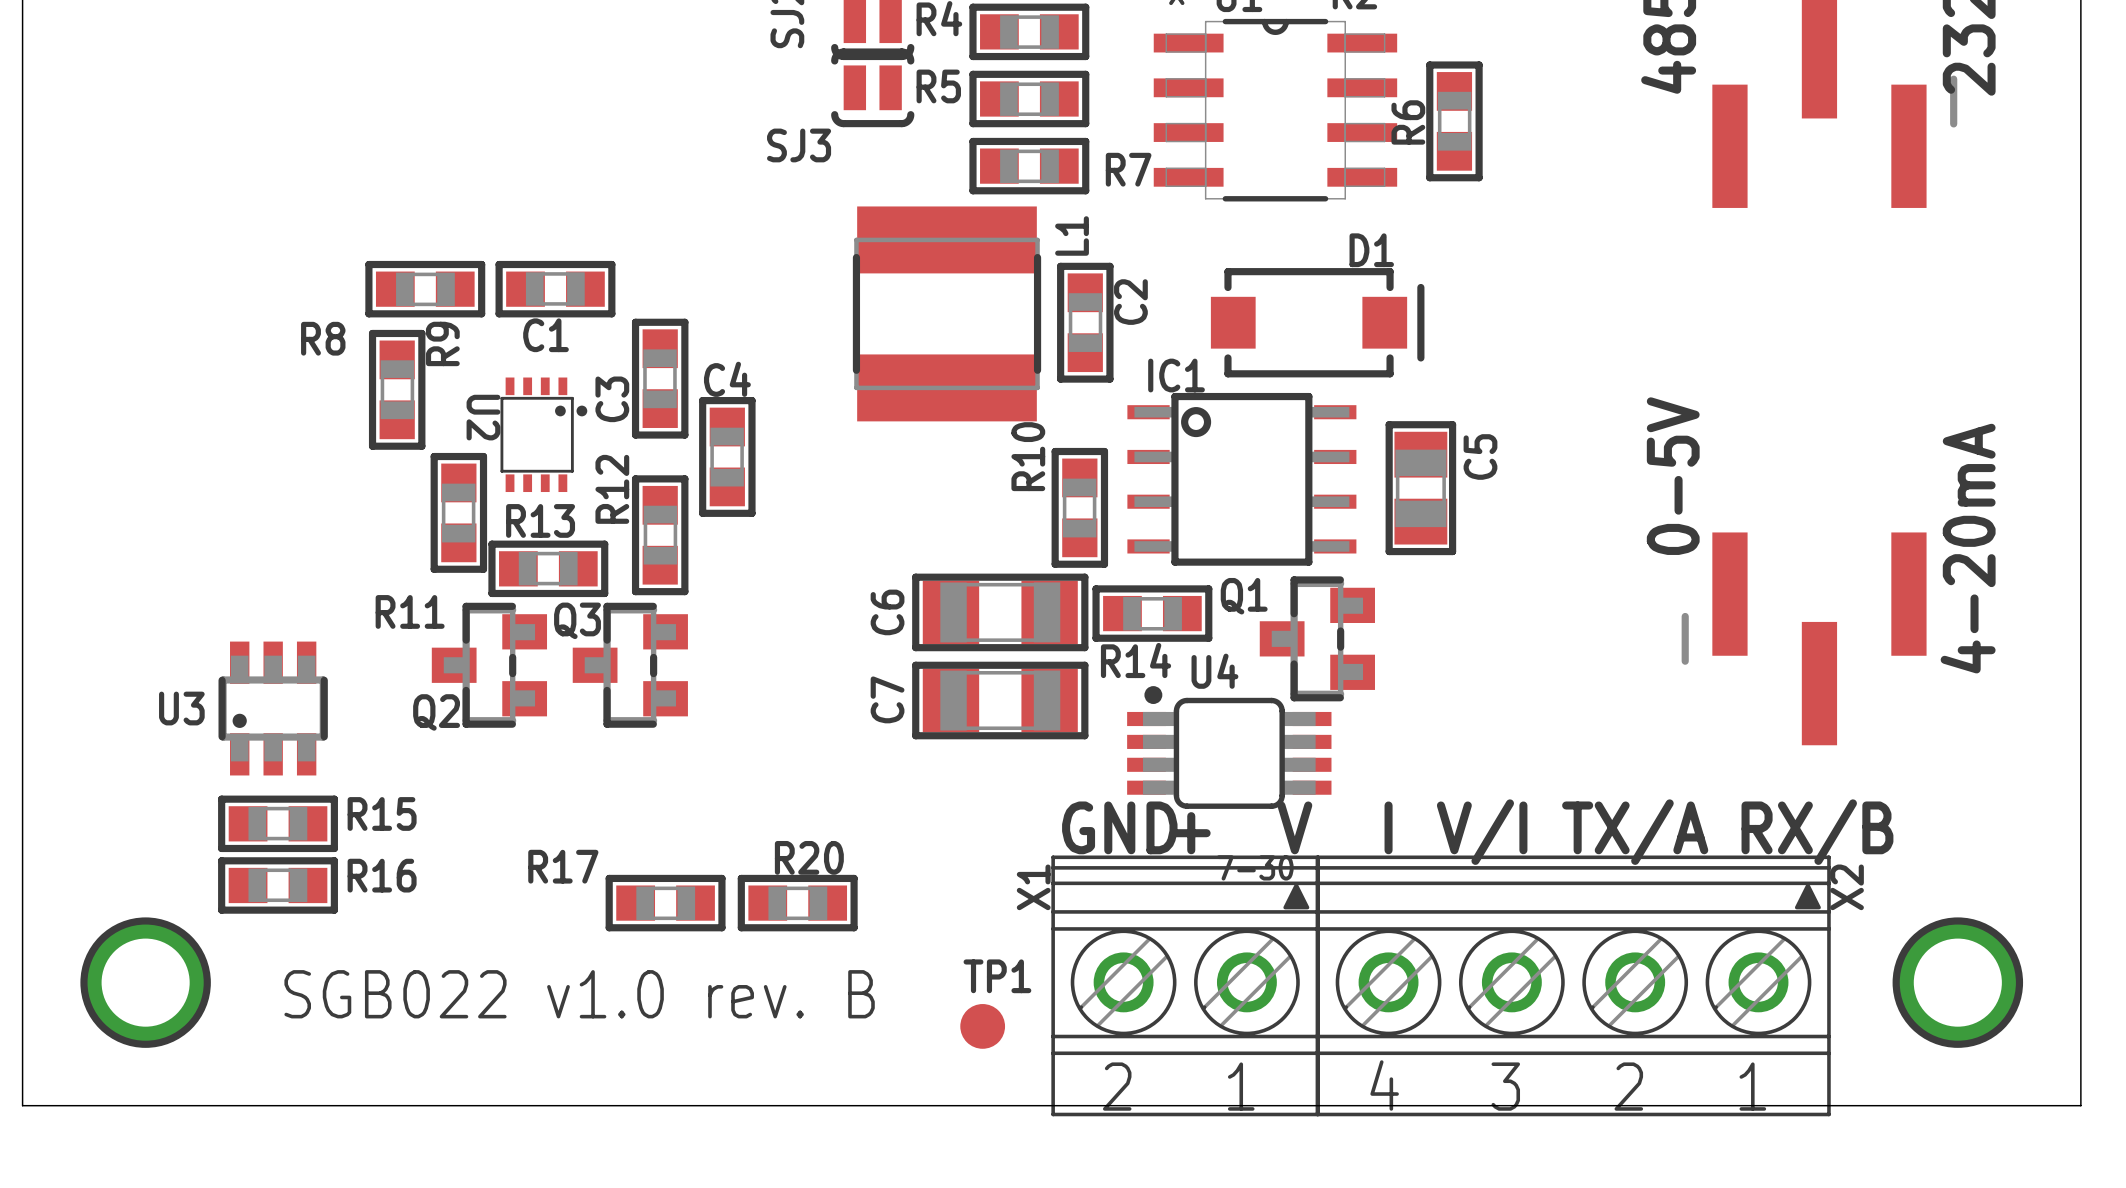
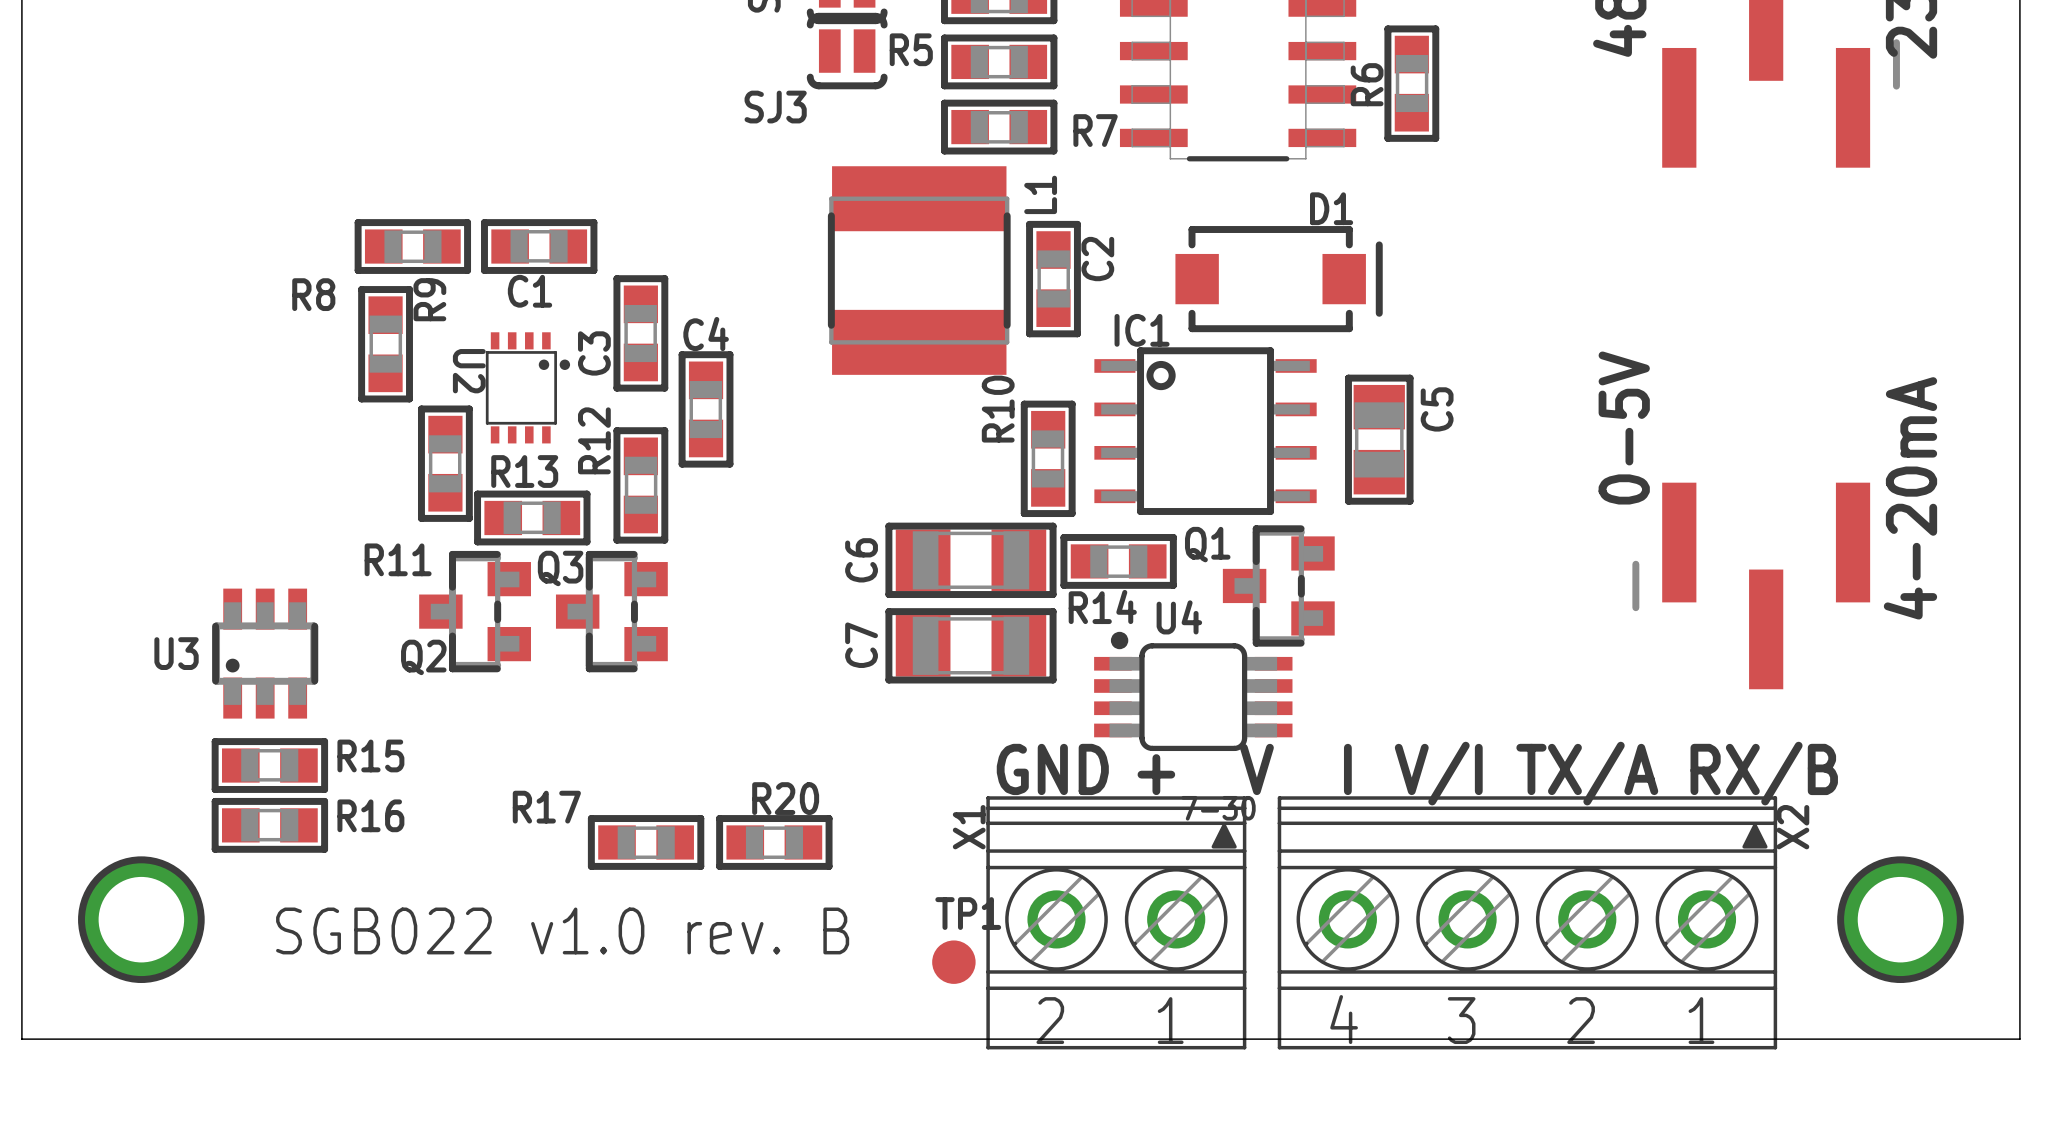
text position: GND (1119, 827) -> GND (1052, 769)
X1 position: (1185, 985) -> (1116, 922)

